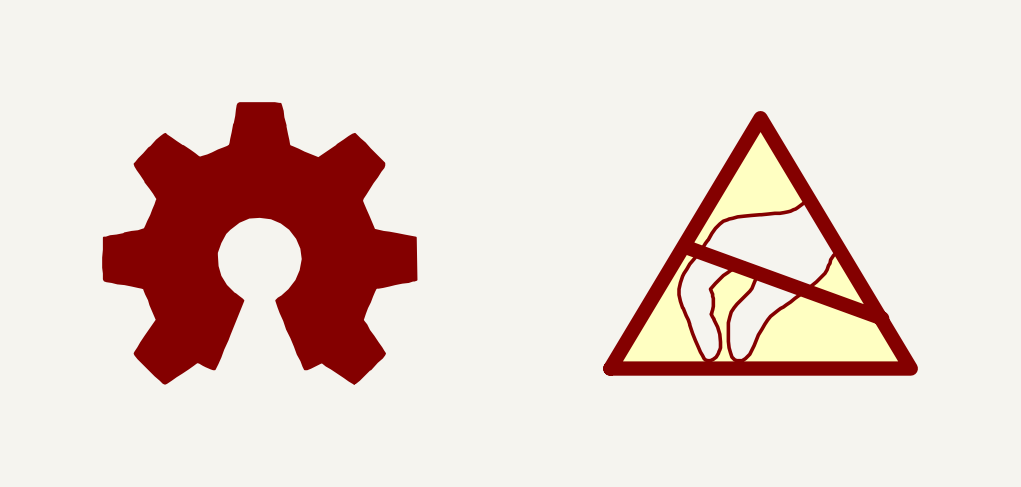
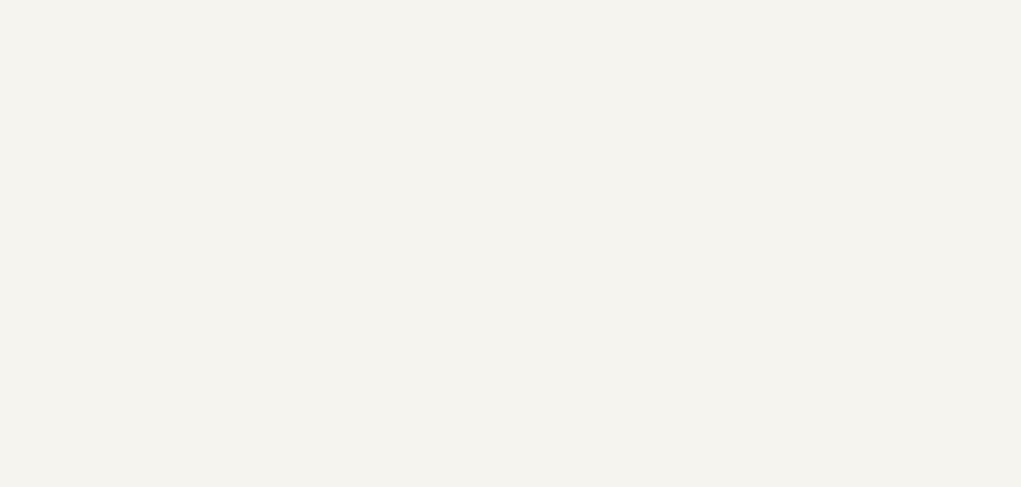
power symbol: (259, 243) -> none
power symbol: (760, 243) -> none

